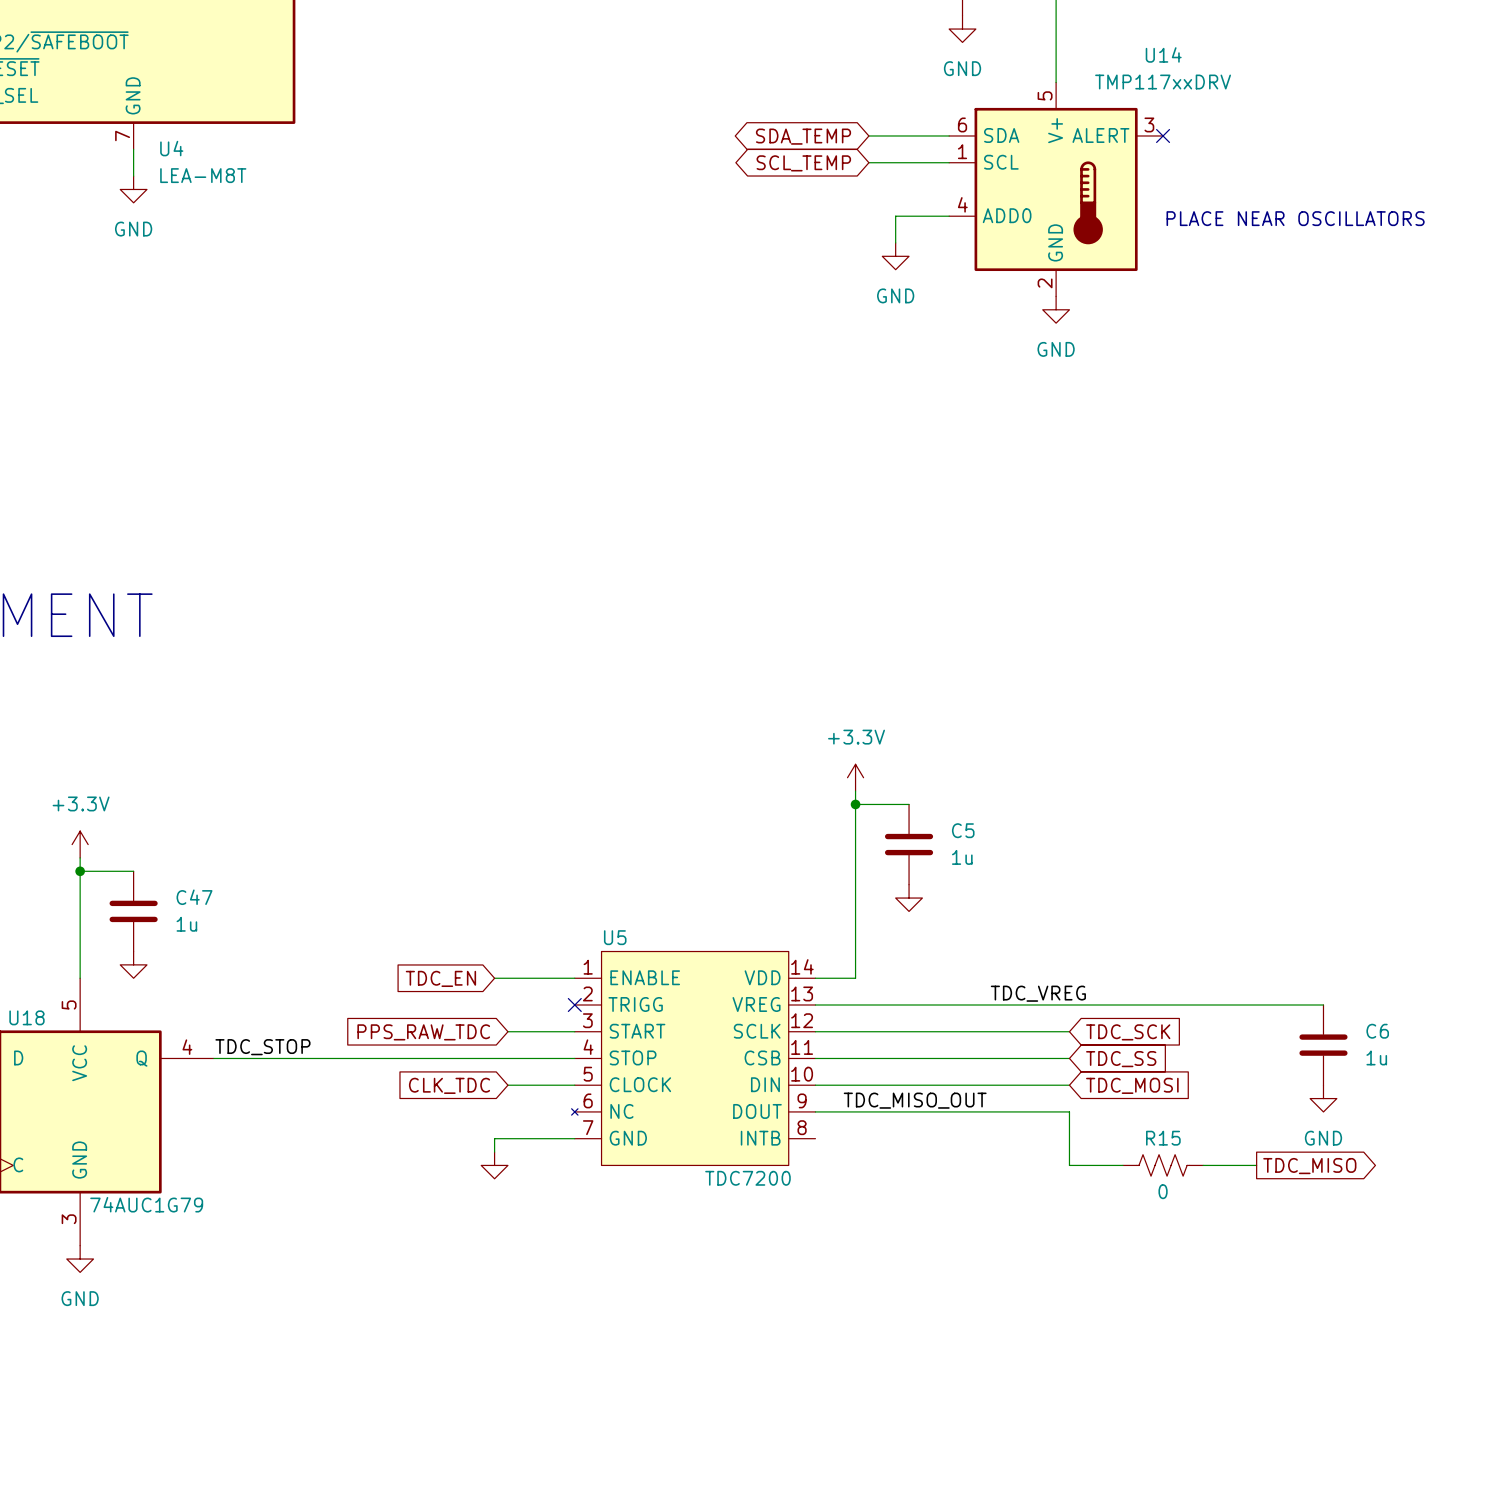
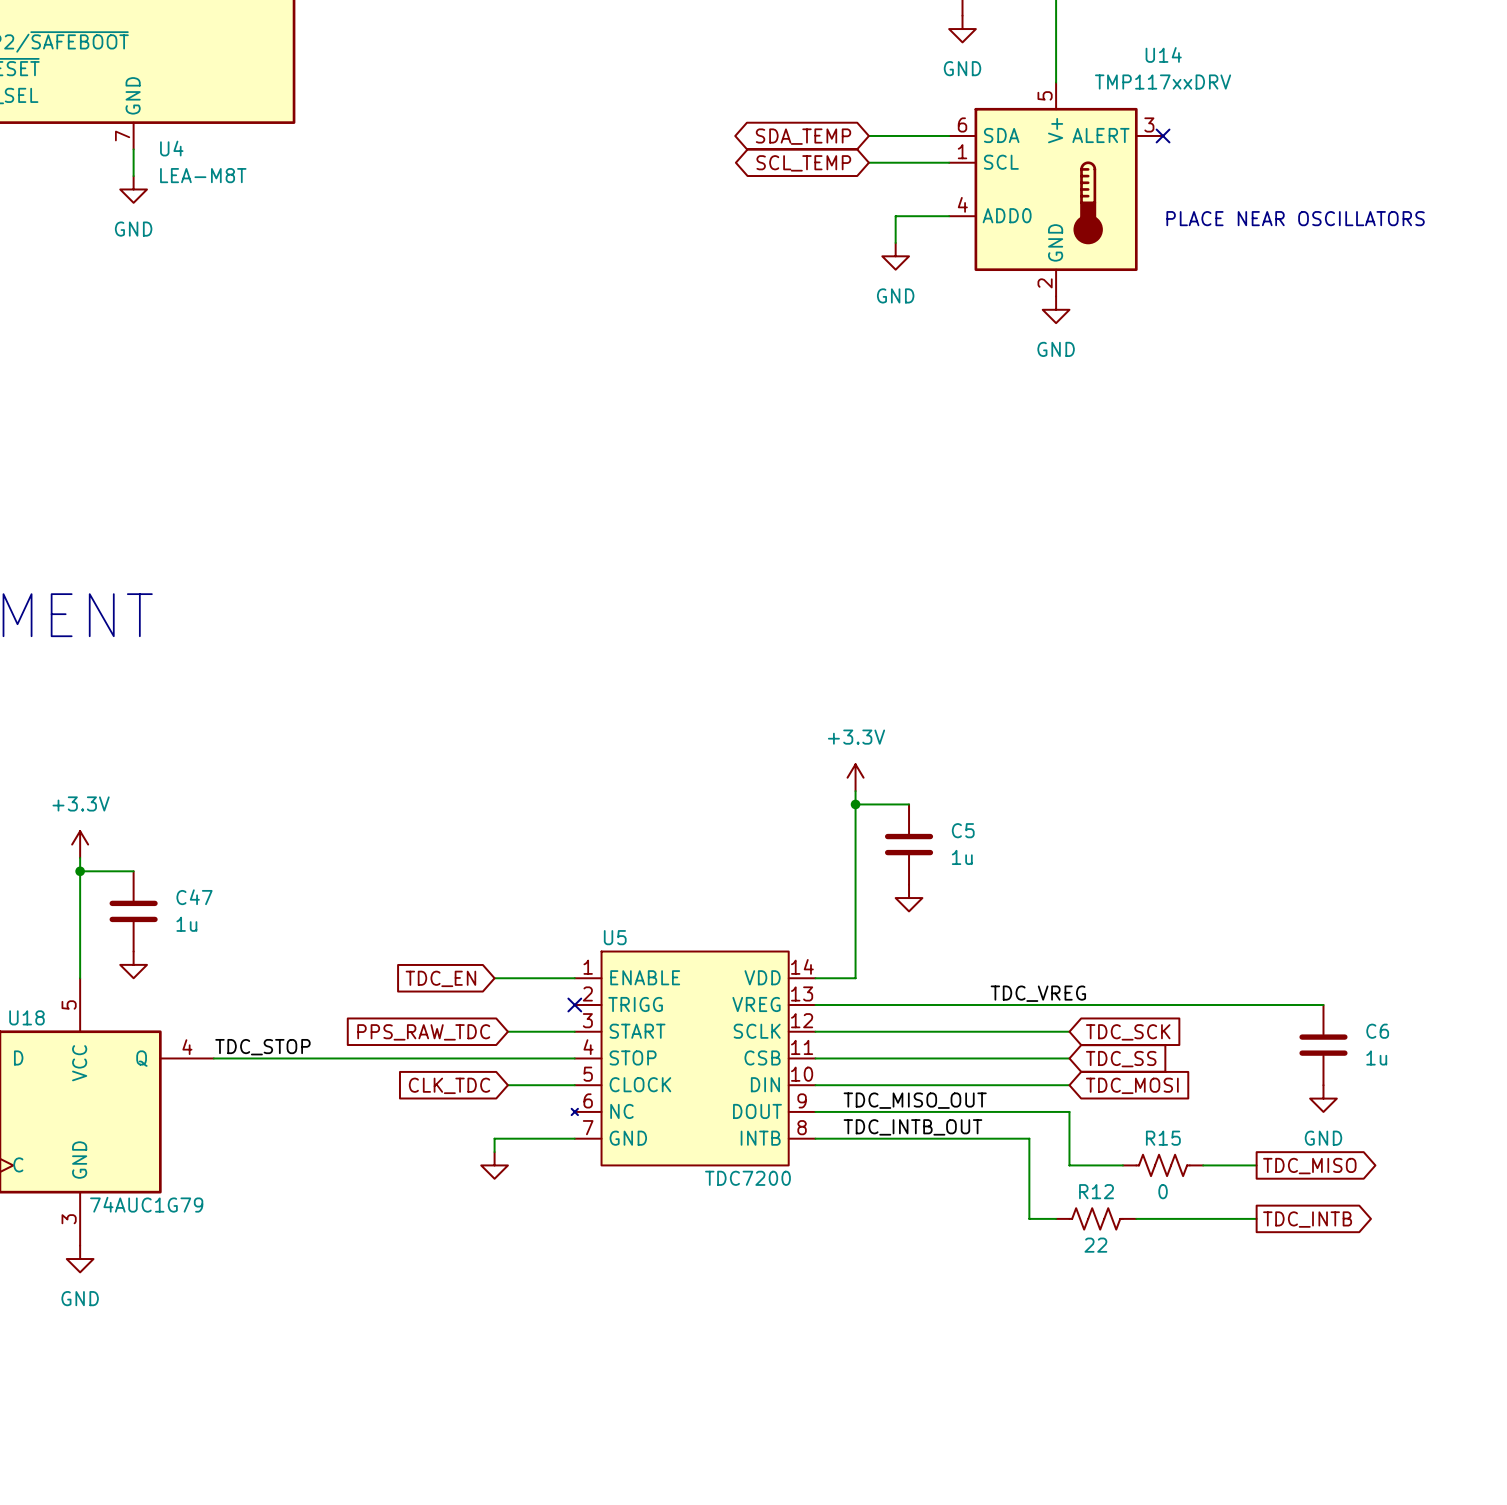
label: none -> TDC_INTB_OUT (912, 1127)
wire: none -> (815, 1138) (1029, 1138) (1029, 1218) (1056, 1218)
R12: none -> 22 (1096, 1218)
wire: none -> (1136, 1218) (1256, 1218)
global label: none -> TDC_INTB (1307, 1219)

